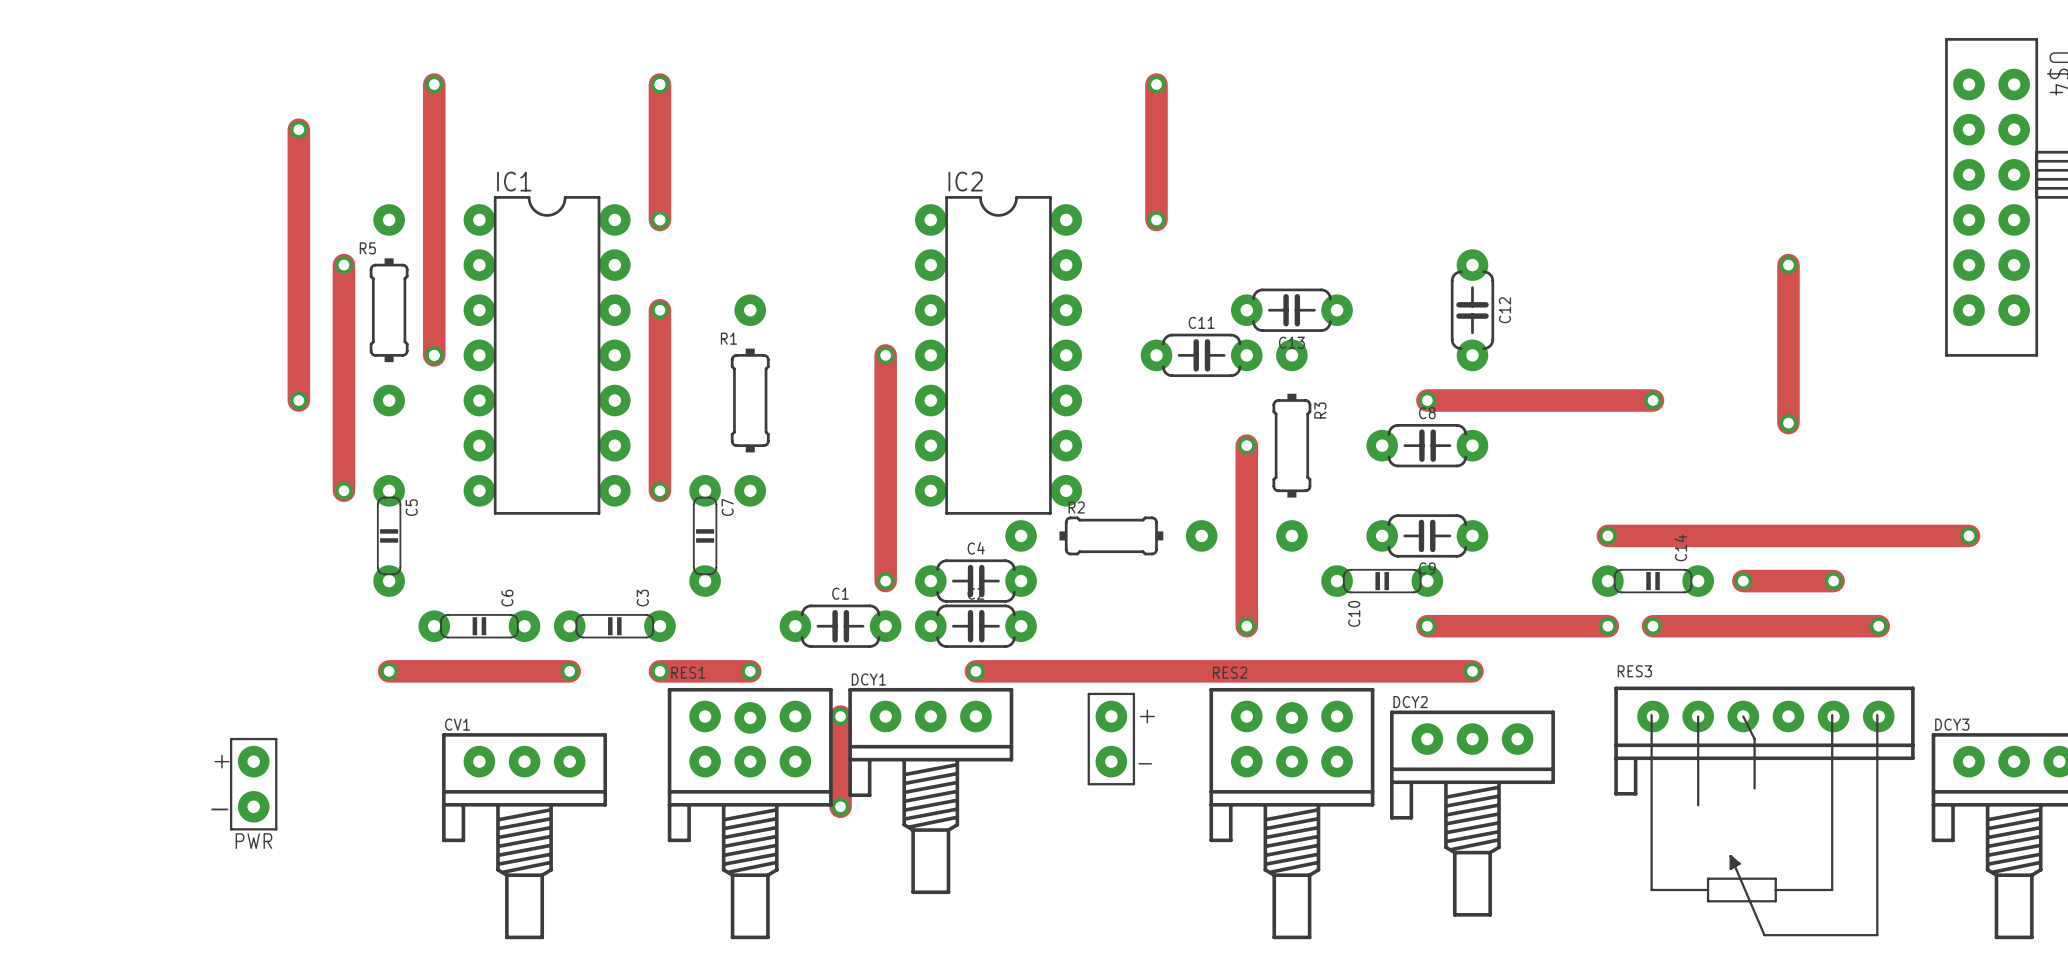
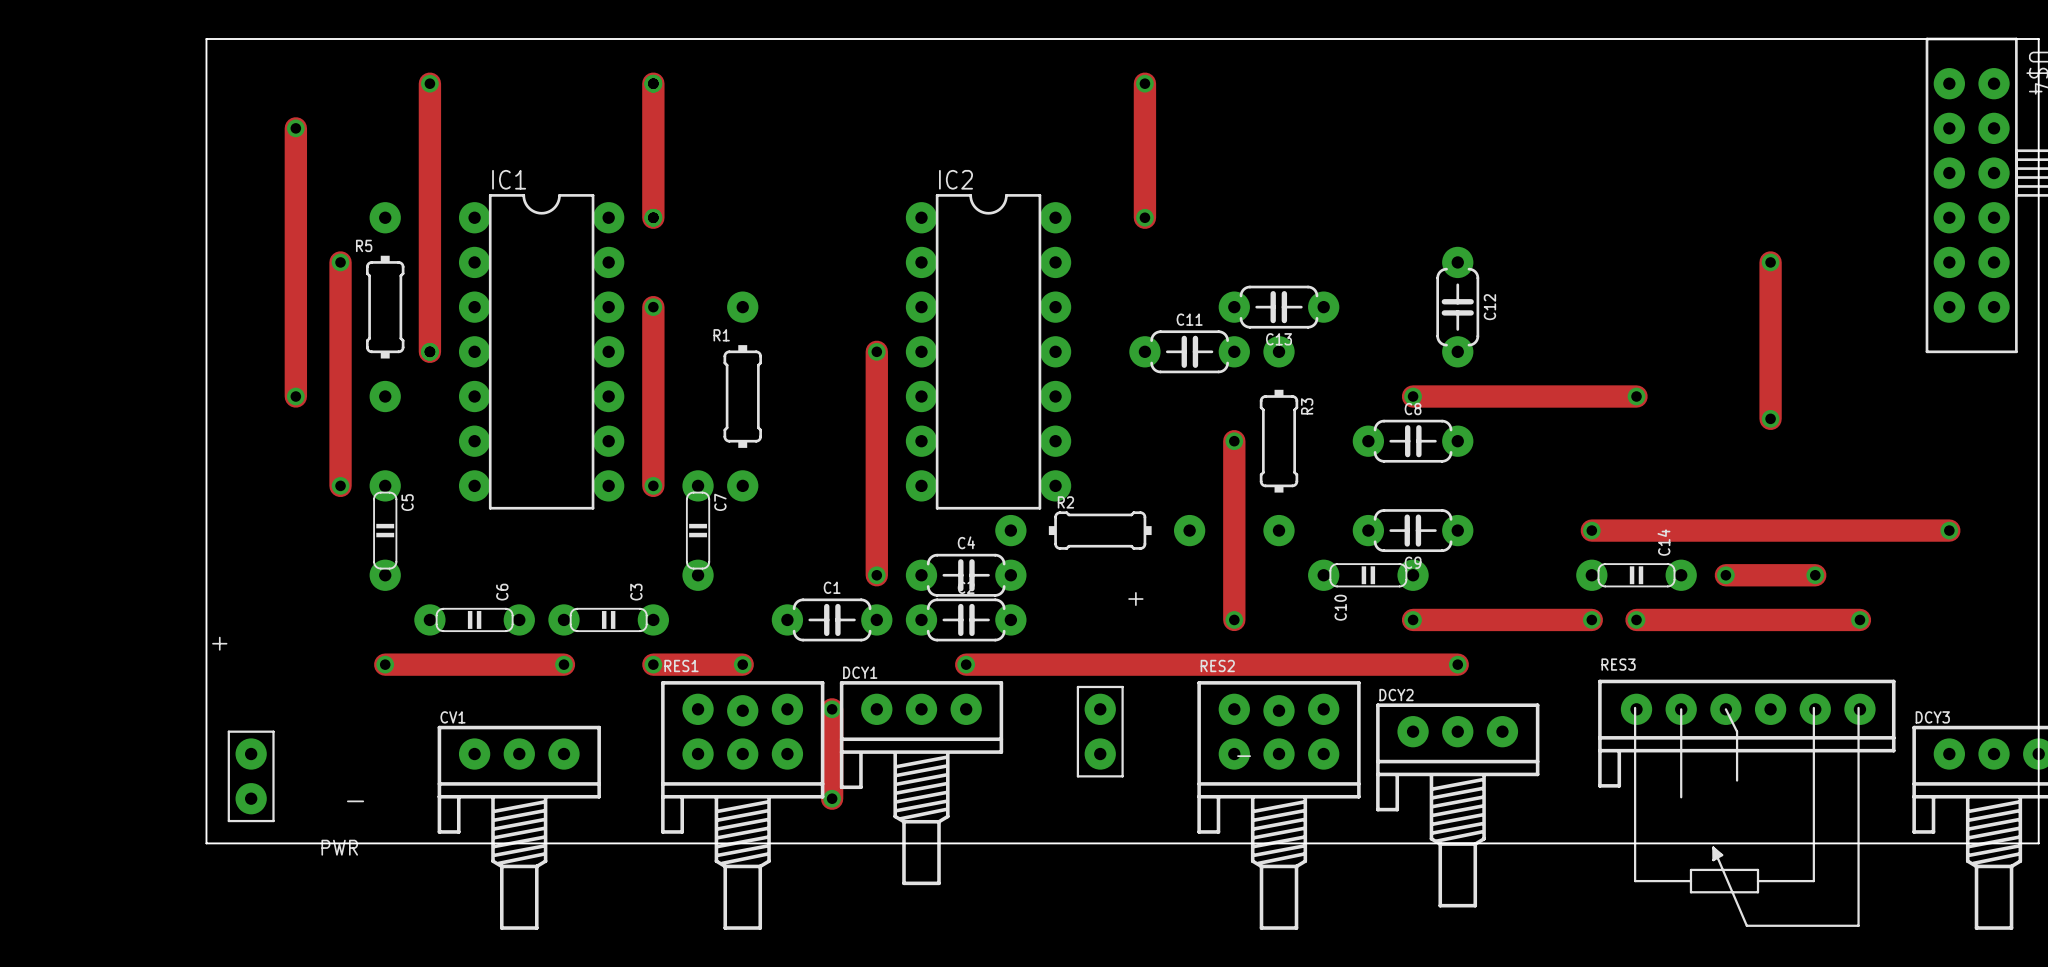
board edge: none -> (206, 38) (2038, 38) (2038, 843) (206, 843) (206, 38)
part footprint: [1087, 692, 1136, 786] -> [1076, 685, 1124, 778]
part footprint: [229, 737, 278, 831] -> [227, 730, 275, 823]

